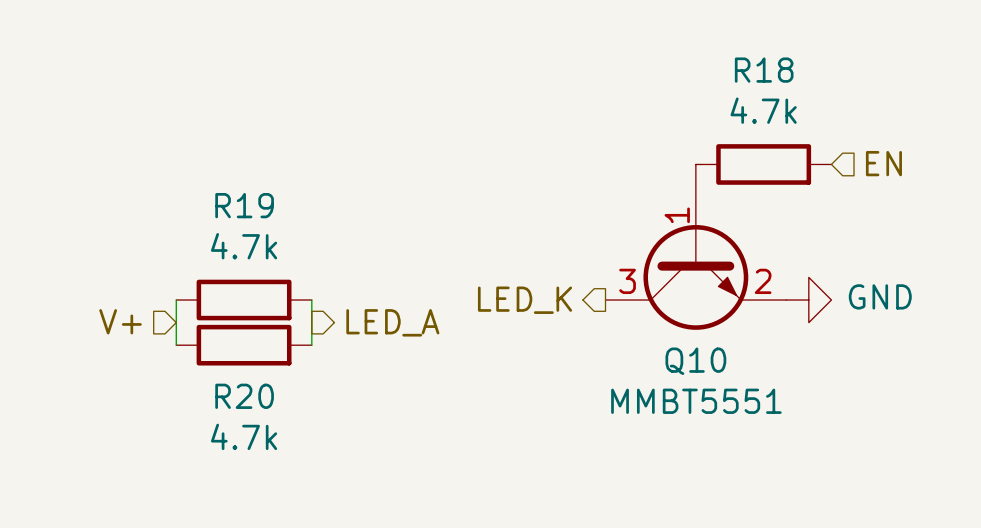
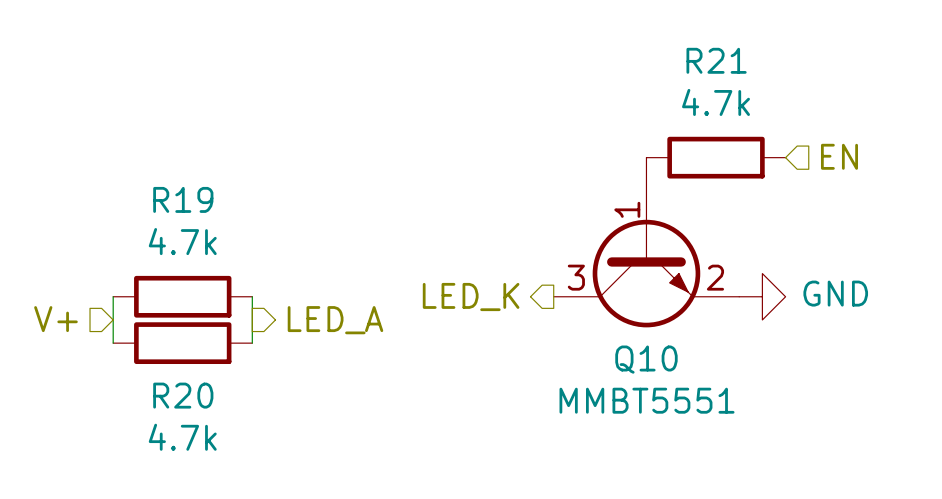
R18 name: R18 (764, 70) -> R21 (716, 60)

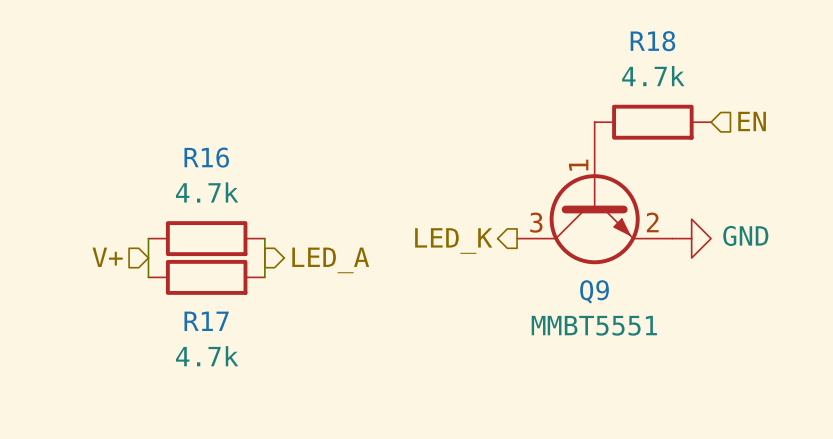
R21 name: R21 (716, 60) -> R18 (652, 41)
R19 name: R19 (183, 199) -> R16 (206, 157)
Q10 name: Q10 (646, 359) -> Q9 (594, 291)
R20 name: R20 (183, 395) -> R17 (206, 321)

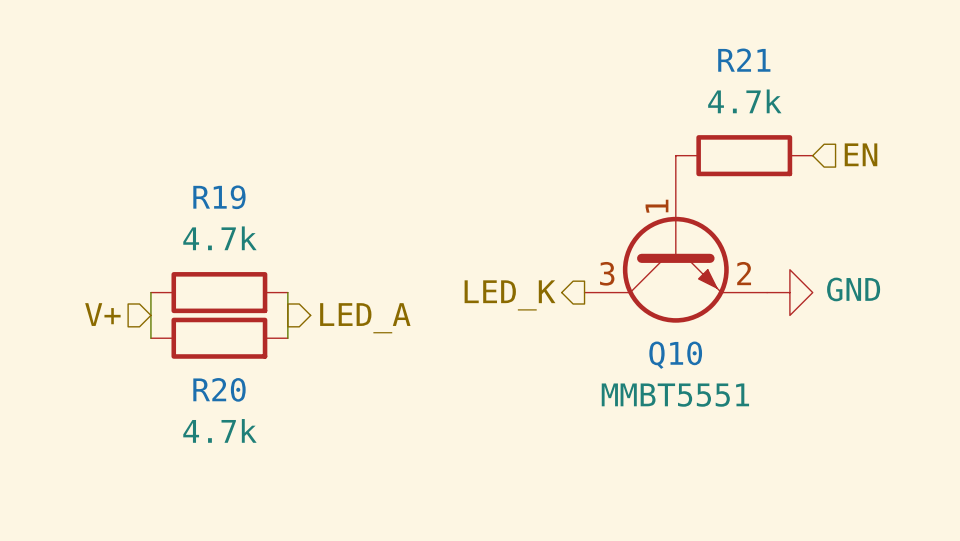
R18 name: R18 (652, 41) -> R21 (744, 60)
R16 name: R16 (206, 157) -> R19 (219, 197)
Q9 name: Q9 (594, 291) -> Q10 (675, 355)
R17 name: R17 (206, 321) -> R20 (219, 389)

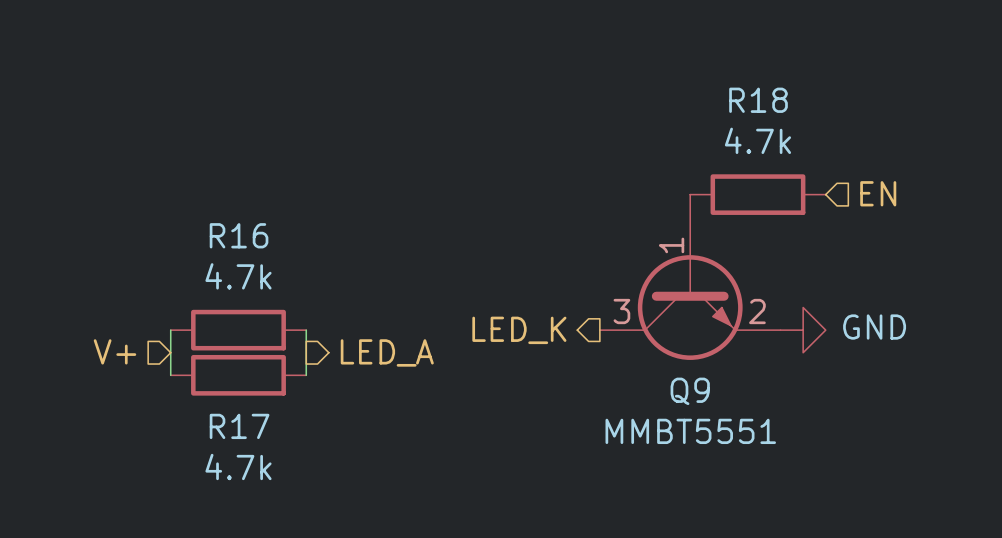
R21 name: R21 (744, 60) -> R18 (758, 100)
R19 name: R19 (219, 197) -> R16 (239, 235)
Q10 name: Q10 (675, 355) -> Q9 (690, 391)
R20 name: R20 (219, 389) -> R17 (239, 426)

